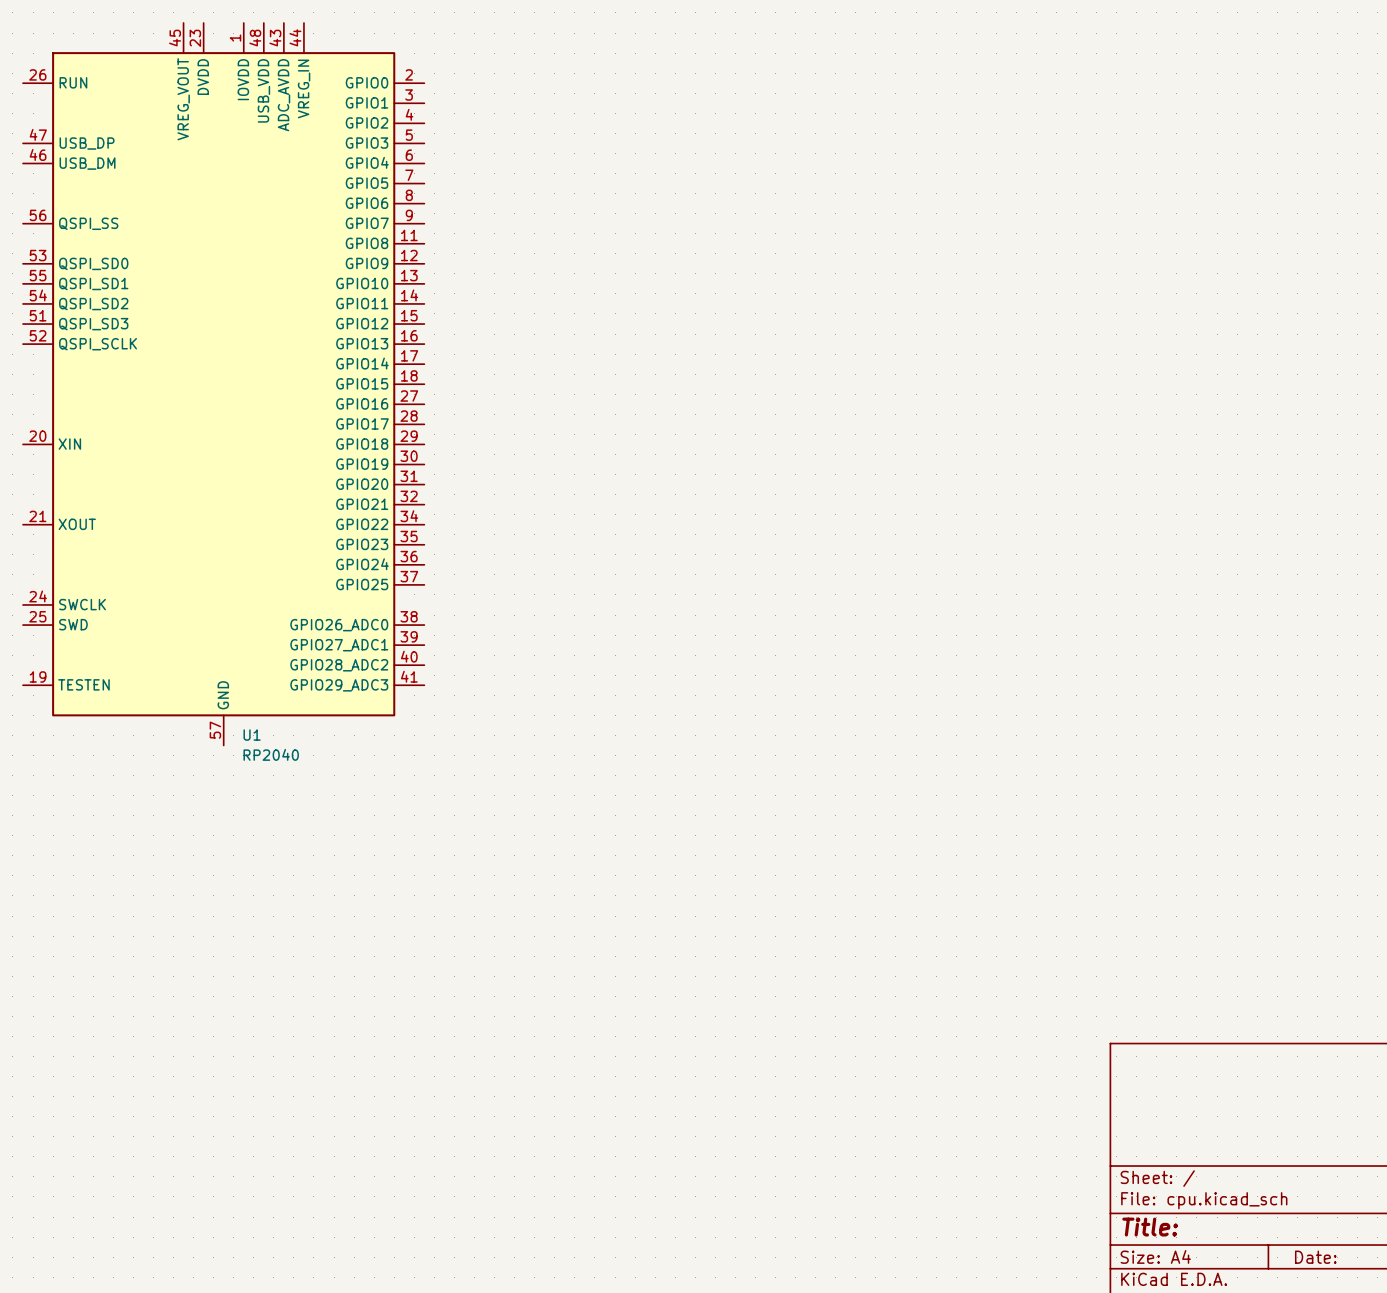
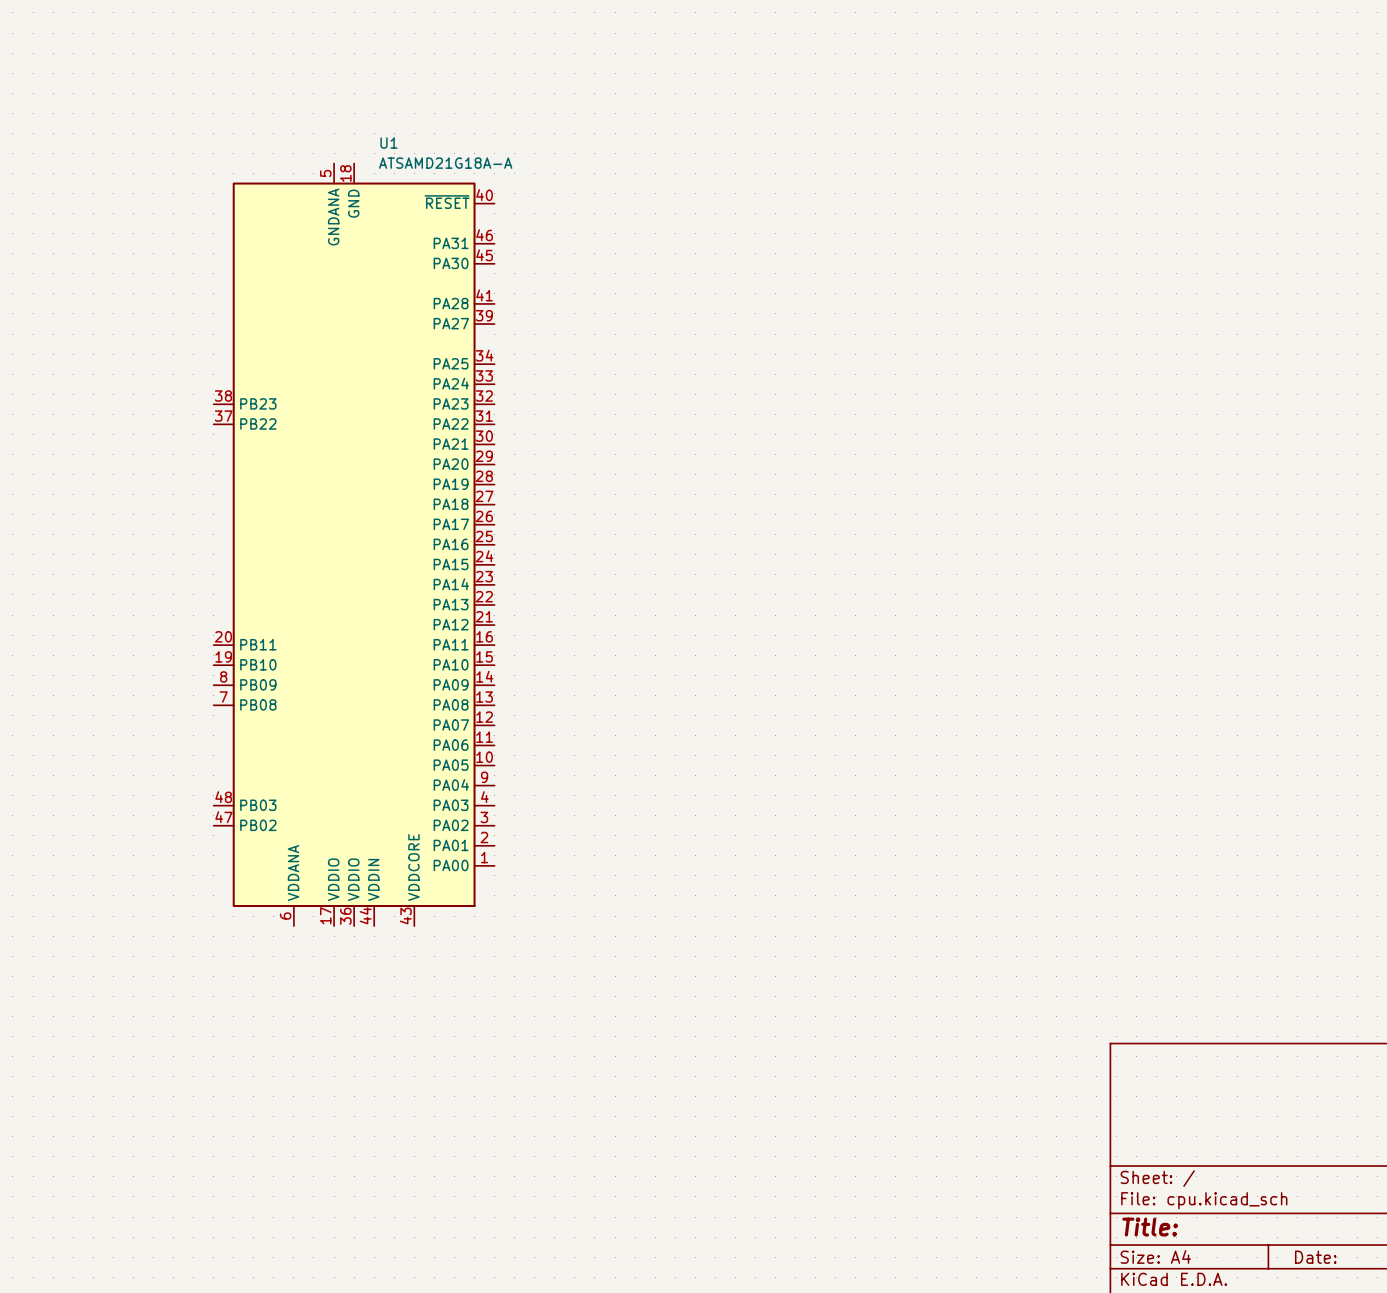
U1 symbol: [23, 23, 425, 746] -> [213, 163, 495, 927]
U1 name position: U1 (252, 735) -> U1 (389, 143)
U1 value: RP2040 (271, 754) -> ATSAMD21G18A-A (445, 163)

